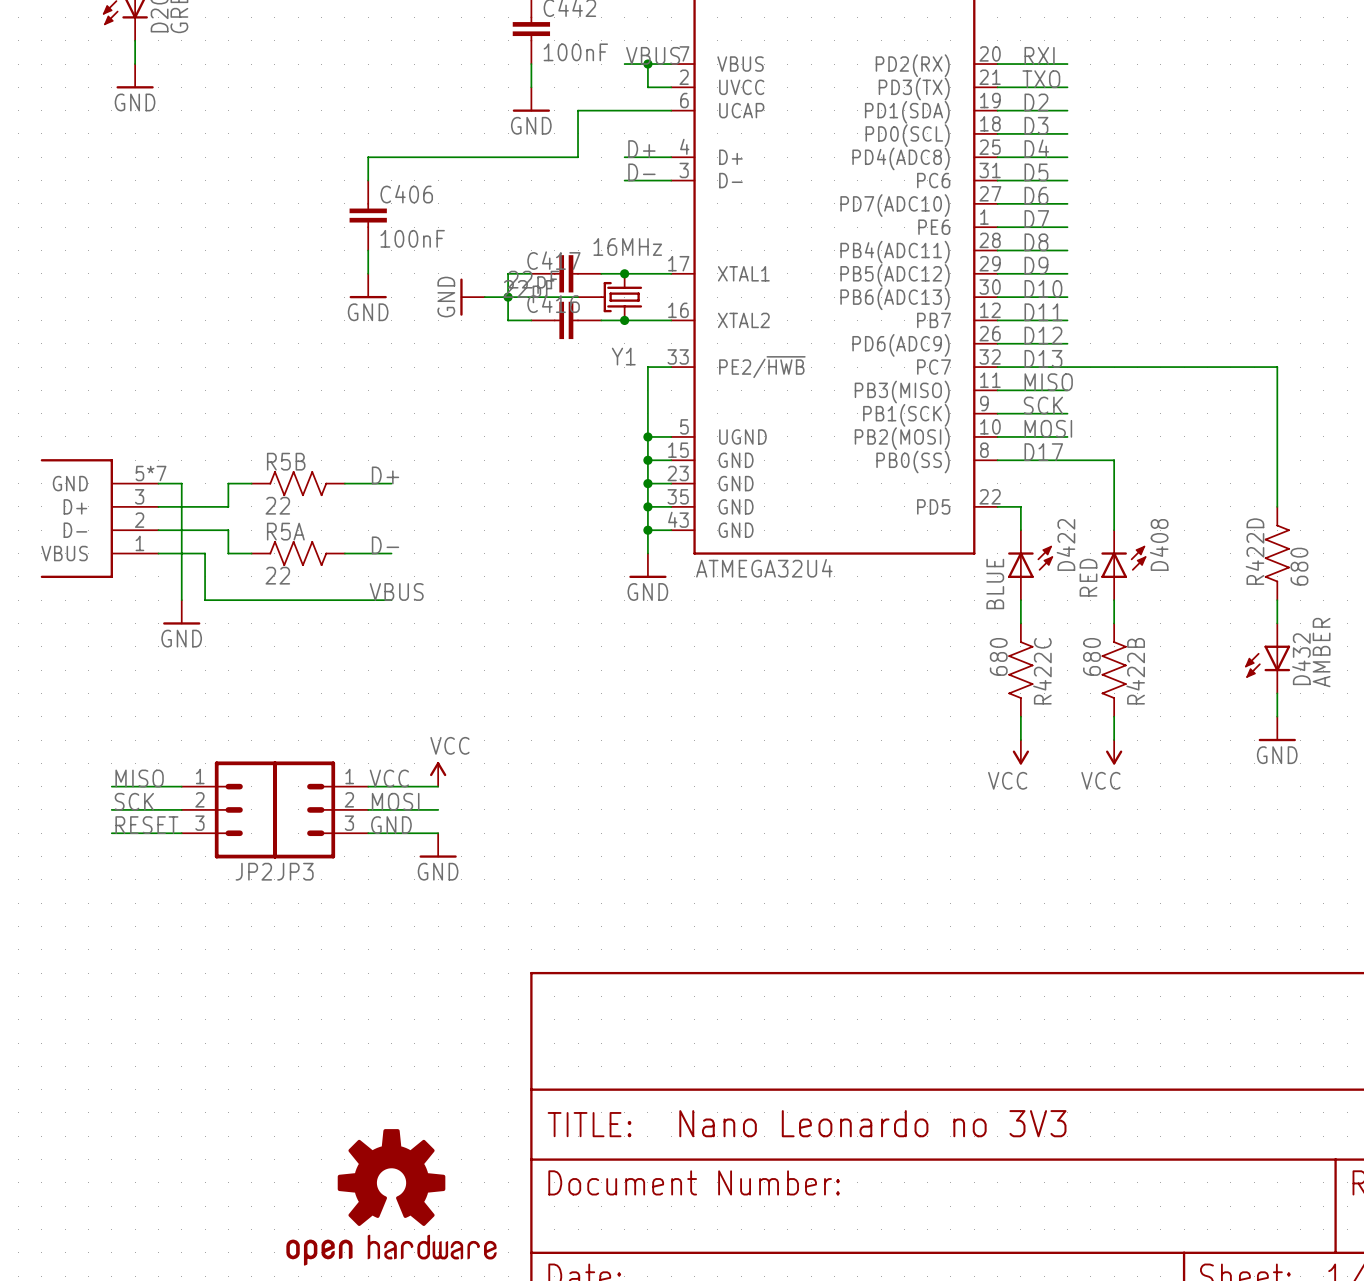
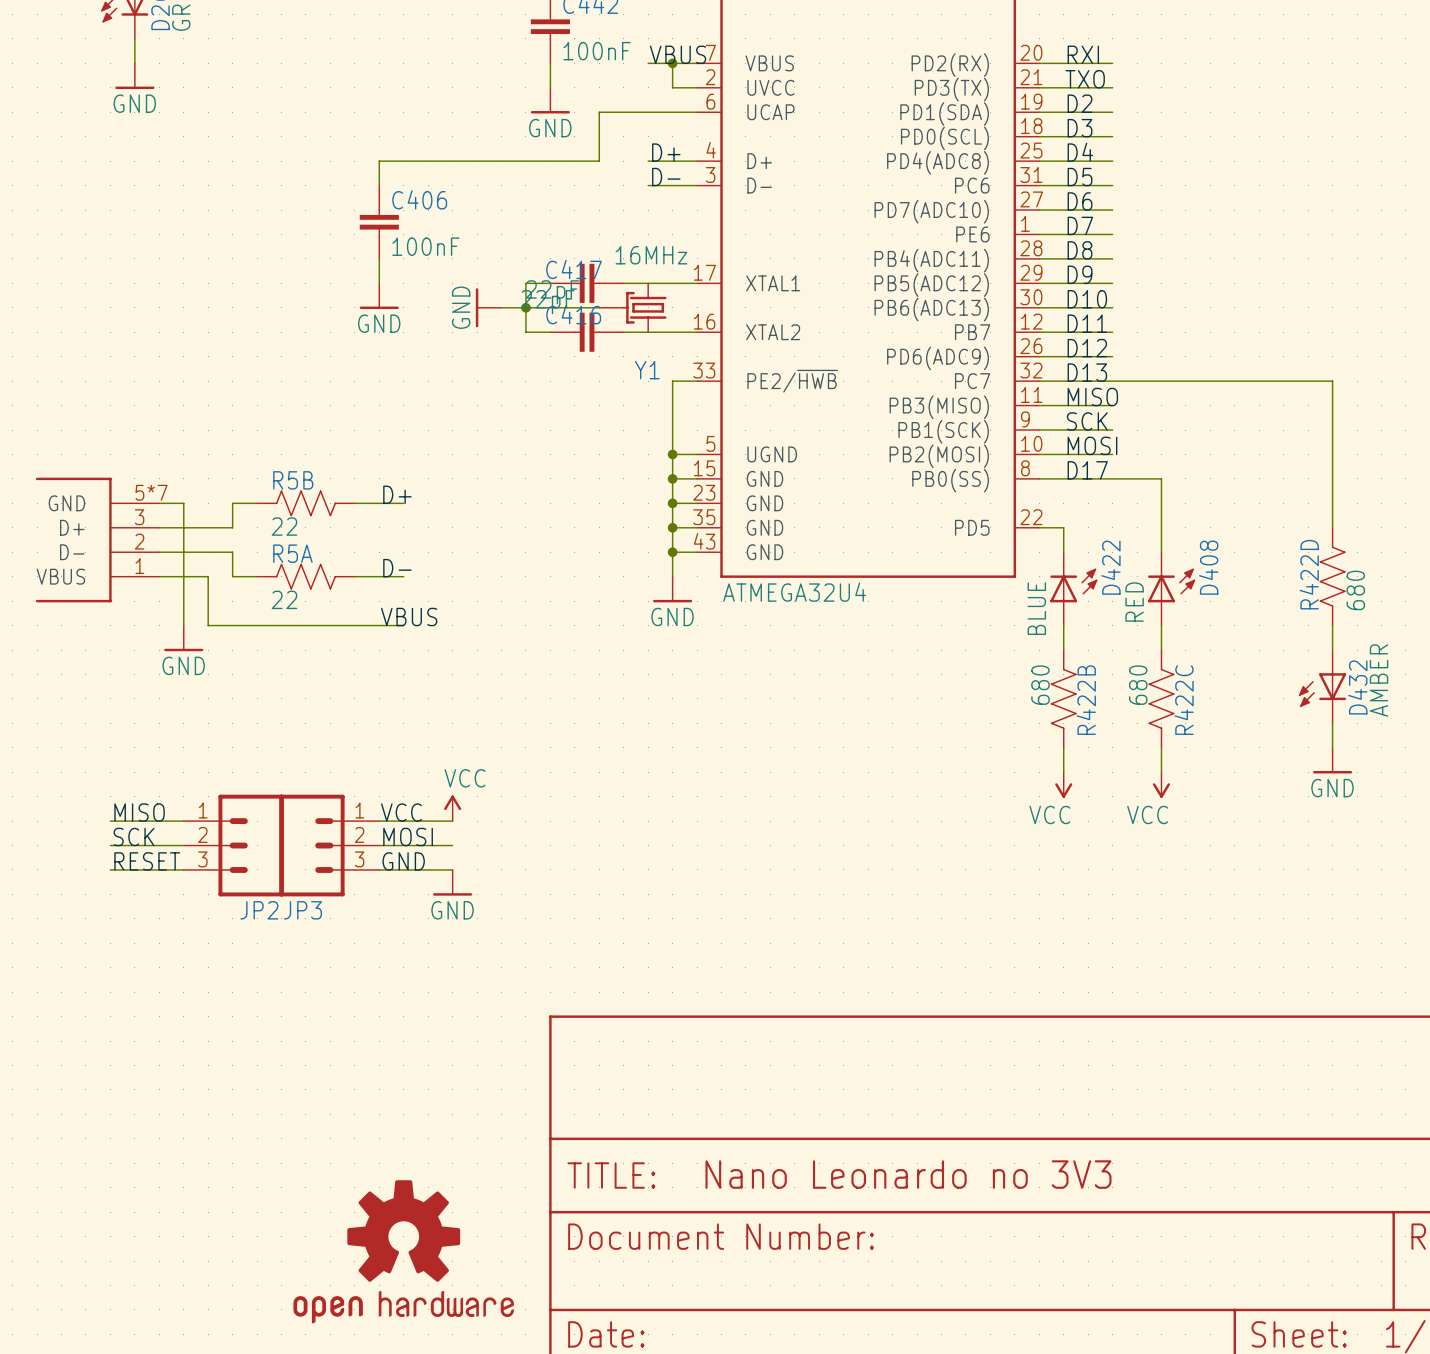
junction: (624, 273) -> none
junction: (624, 320) -> none
R422C name: R422C (1042, 671) -> R422B (1086, 700)
R422B name: R422B (1135, 671) -> R422C (1184, 700)

